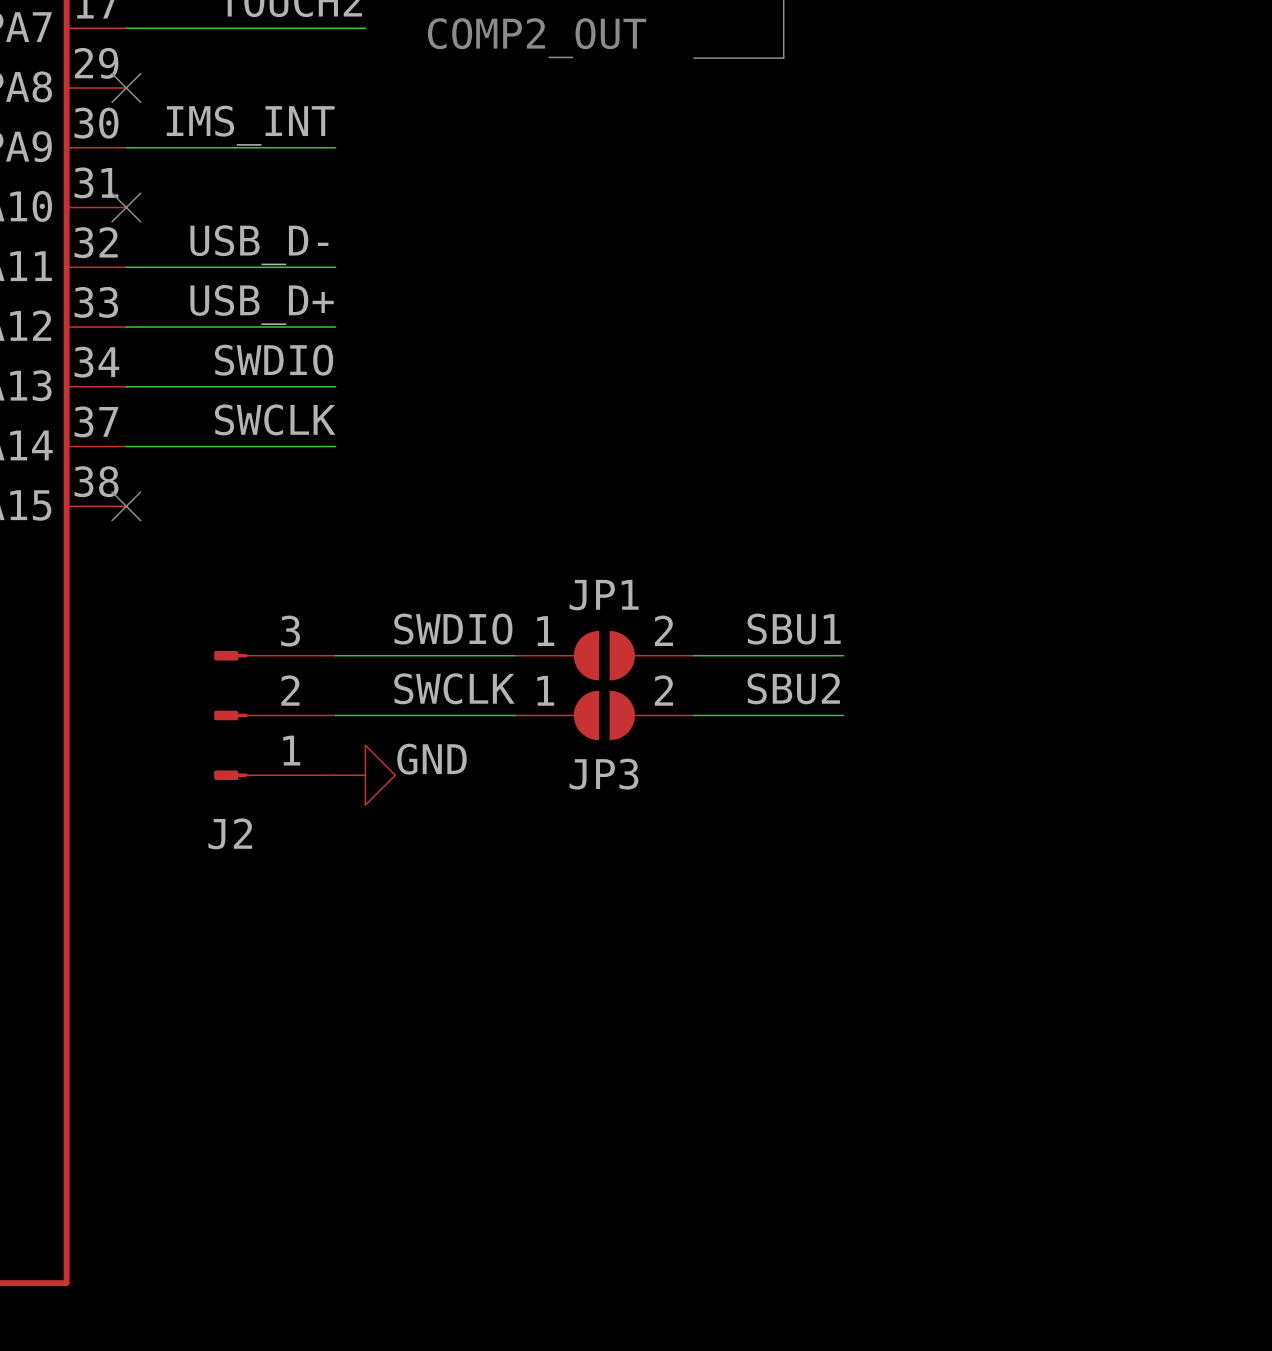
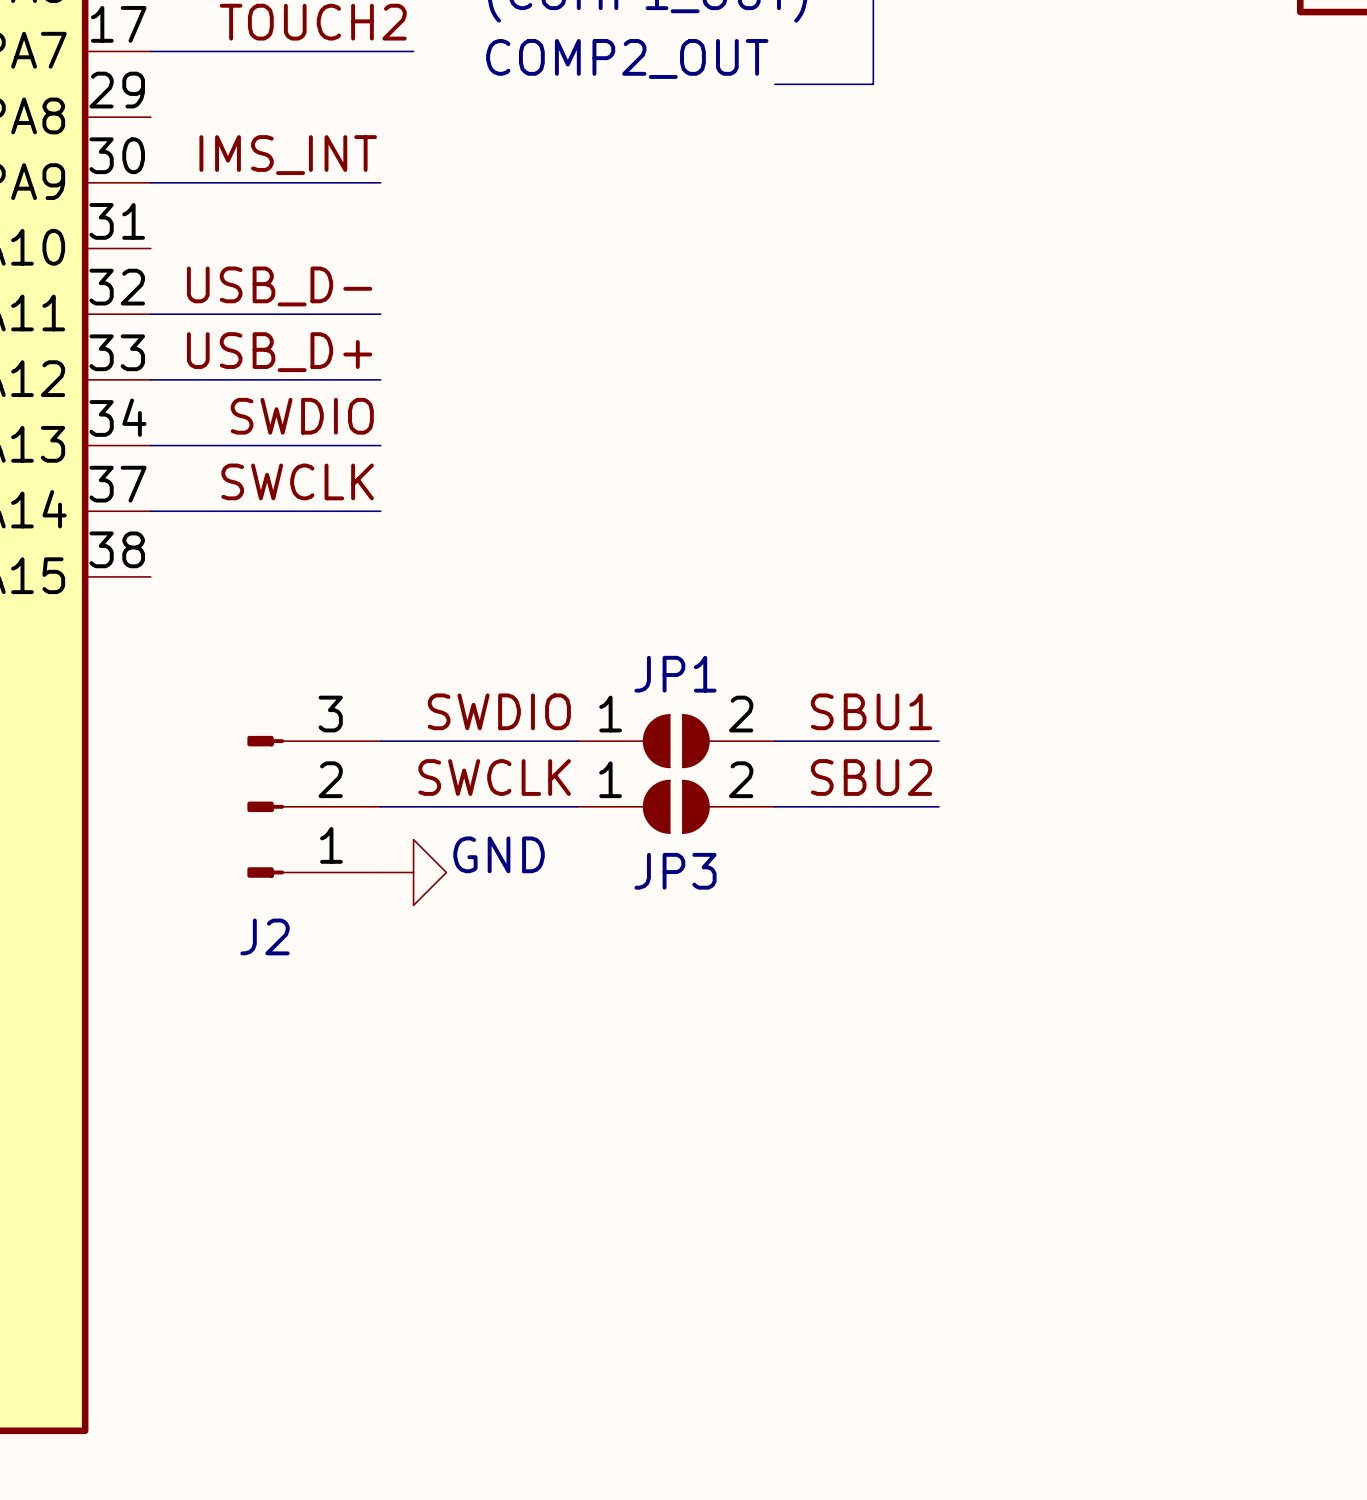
no-connect mark: (126, 88) -> none
no-connect mark: (126, 207) -> none
no-connect mark: (126, 506) -> none

